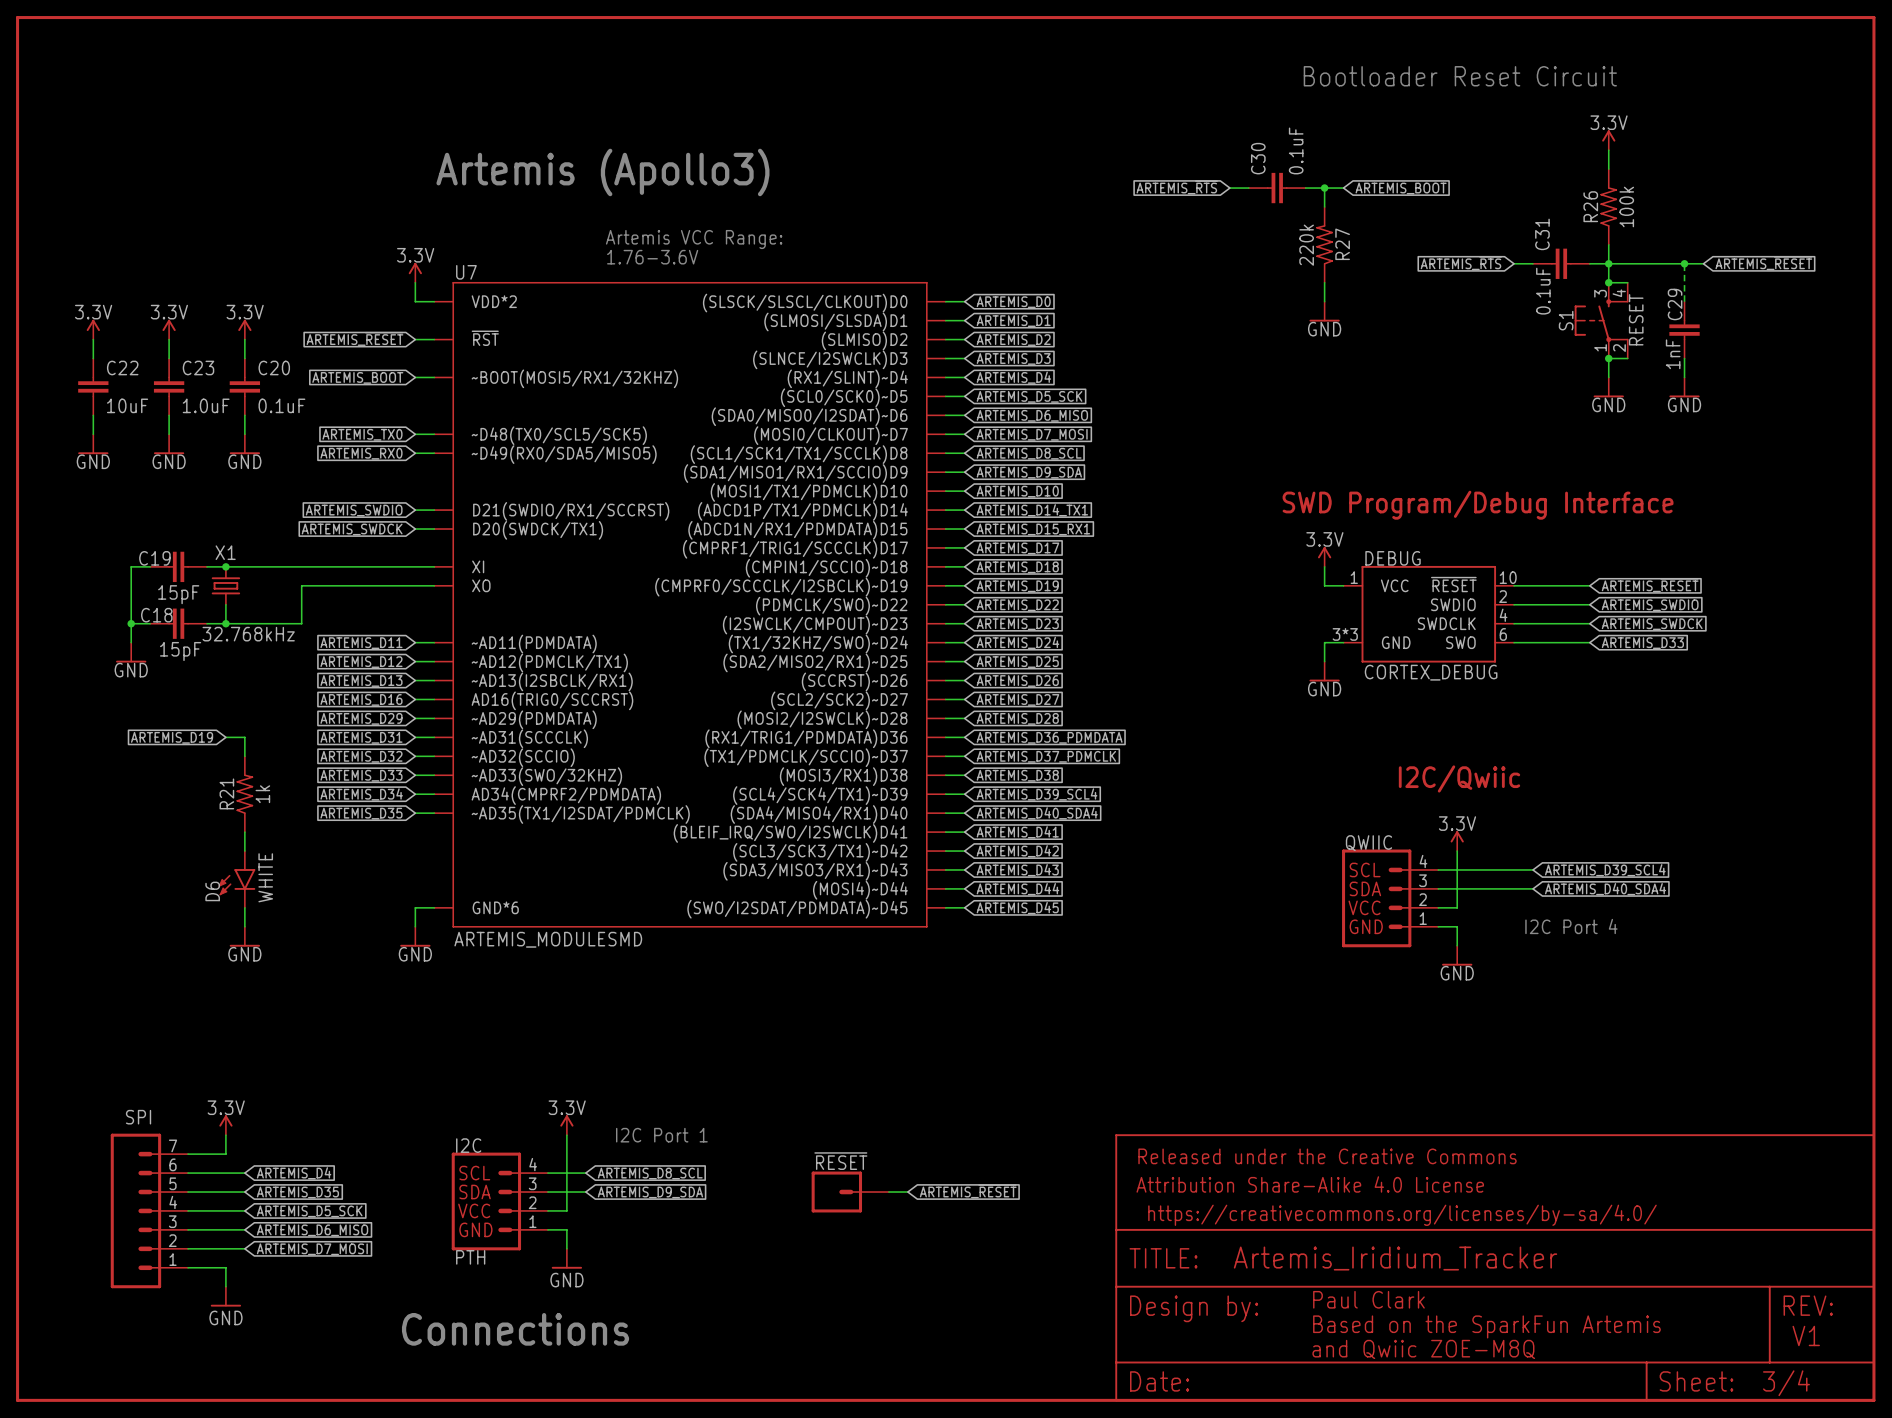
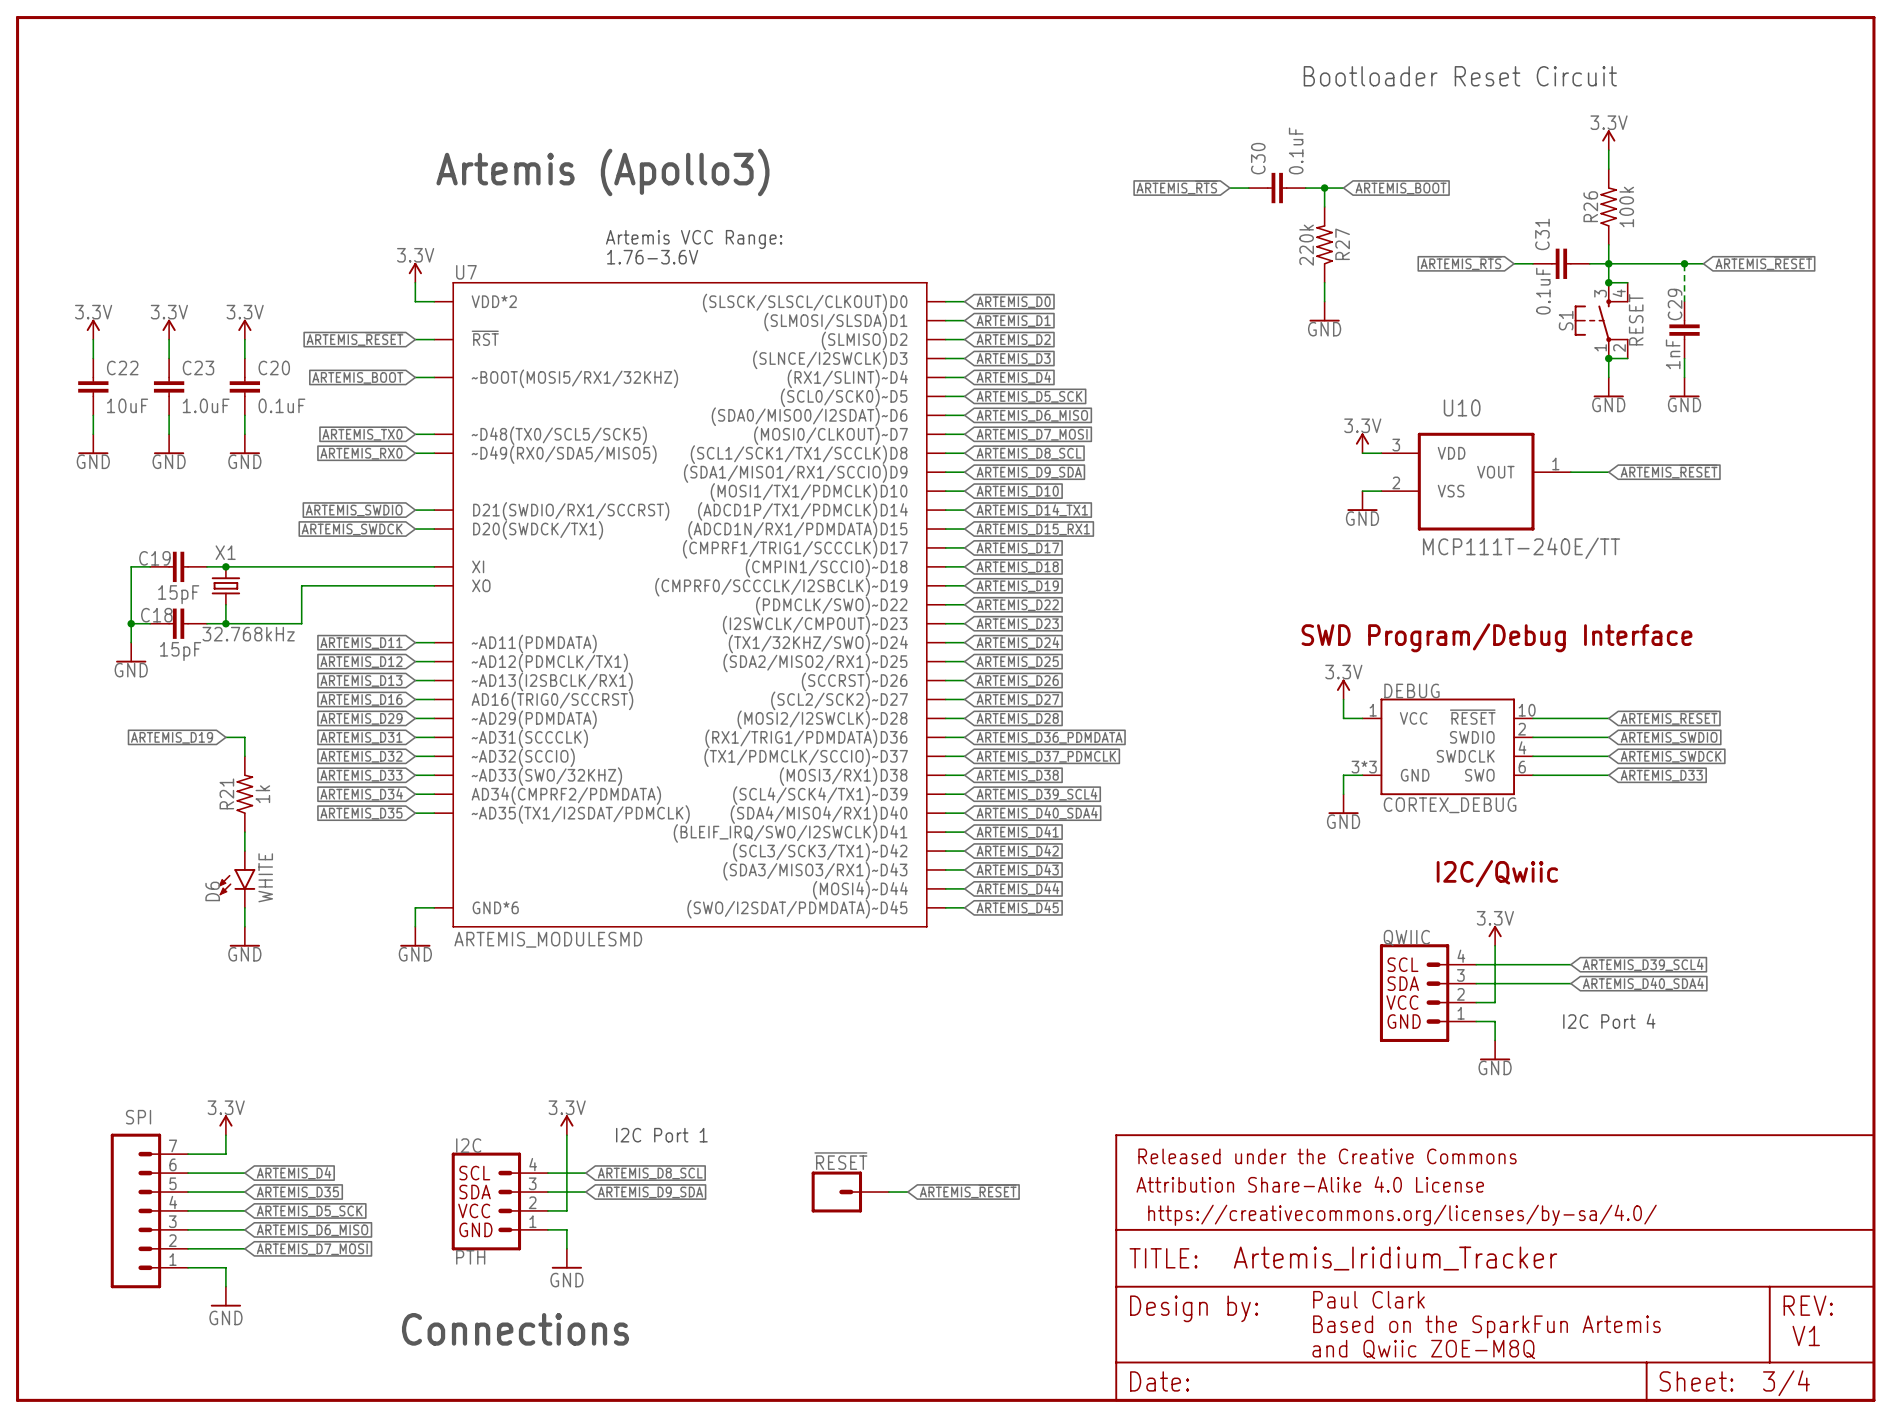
power symbol: none -> 3.3V (1362, 443)
wire: none -> (1362, 453) (1381, 453)
global label: none -> ARTEMIS_~{RESET} (1669, 471)
wire: none -> (1570, 472) (1608, 472)
U10: none -> MCP111T-240E/TT (1476, 481)
wire: none -> (1362, 491) (1381, 491)
power symbol: none -> GND (1362, 501)
text position: SWD Program/Debug Interface (1478, 505) -> SWD Program/Debug Interface (1496, 637)
power symbol: 3.3V (1324, 556) -> none
wire: (1324, 566) (1324, 585) (1343, 585) -> (1343, 699) (1343, 718) (1362, 718)
wire: (1514, 585) (1589, 585) -> (1532, 718) (1608, 718)
global label: ARTEMIS_~{RESET} (1650, 585) -> none
wire: (1514, 604) (1589, 604) -> (1532, 737) (1608, 737)
global label position: ARTEMIS_SWDIO (1650, 605) -> ARTEMIS_SWDIO (1669, 737)
DEBUG position: (1428, 614) -> (1447, 746)
wire: (1514, 623) (1589, 623) -> (1532, 756) (1608, 756)
global label position: ARTEMIS_SWDCK (1652, 624) -> ARTEMIS_SWDCK (1671, 756)
wire: (1343, 642) (1324, 642) (1324, 661) -> (1362, 775) (1343, 775) (1343, 794)
wire: (1514, 642) (1589, 642) -> (1532, 775) (1608, 775)
global label position: ARTEMIS_D33 (1642, 643) -> ARTEMIS_D33 (1661, 775)
power symbol: GND (1324, 671) -> none
power symbol: none -> 3.3V (1343, 689)
global label: none -> ARTEMIS_~{RESET} (1669, 717)
text position: I2C/Qwiic (1459, 778) -> I2C/Qwiic (1497, 873)
power symbol: none -> GND (1343, 804)
power symbol: 3.3V (1457, 841) -> none
wire: (1457, 851) (1457, 907) (1438, 907) -> (1495, 945) (1495, 1002) (1476, 1002)
wire: (1438, 869) (1532, 869) -> (1476, 964) (1570, 964)
global label position: ARTEMIS_D39_SCL4 (1605, 870) -> ARTEMIS_D39_SCL4 (1643, 964)
wire: (1438, 888) (1532, 888) -> (1476, 983) (1570, 983)
global label position: ARTEMIS_D40_SDA4 (1605, 889) -> ARTEMIS_D40_SDA4 (1643, 983)
QWIIC position: (1390, 898) -> (1428, 993)
wire: (1438, 926) (1457, 926) (1457, 945) -> (1476, 1021) (1495, 1021) (1495, 1040)
text position: I2C Port 4 (1571, 926) -> I2C Port 4 (1609, 1021)
power symbol: none -> 3.3V (1495, 935)
power symbol: GND (1457, 955) -> none
power symbol: none -> GND (1495, 1050)

